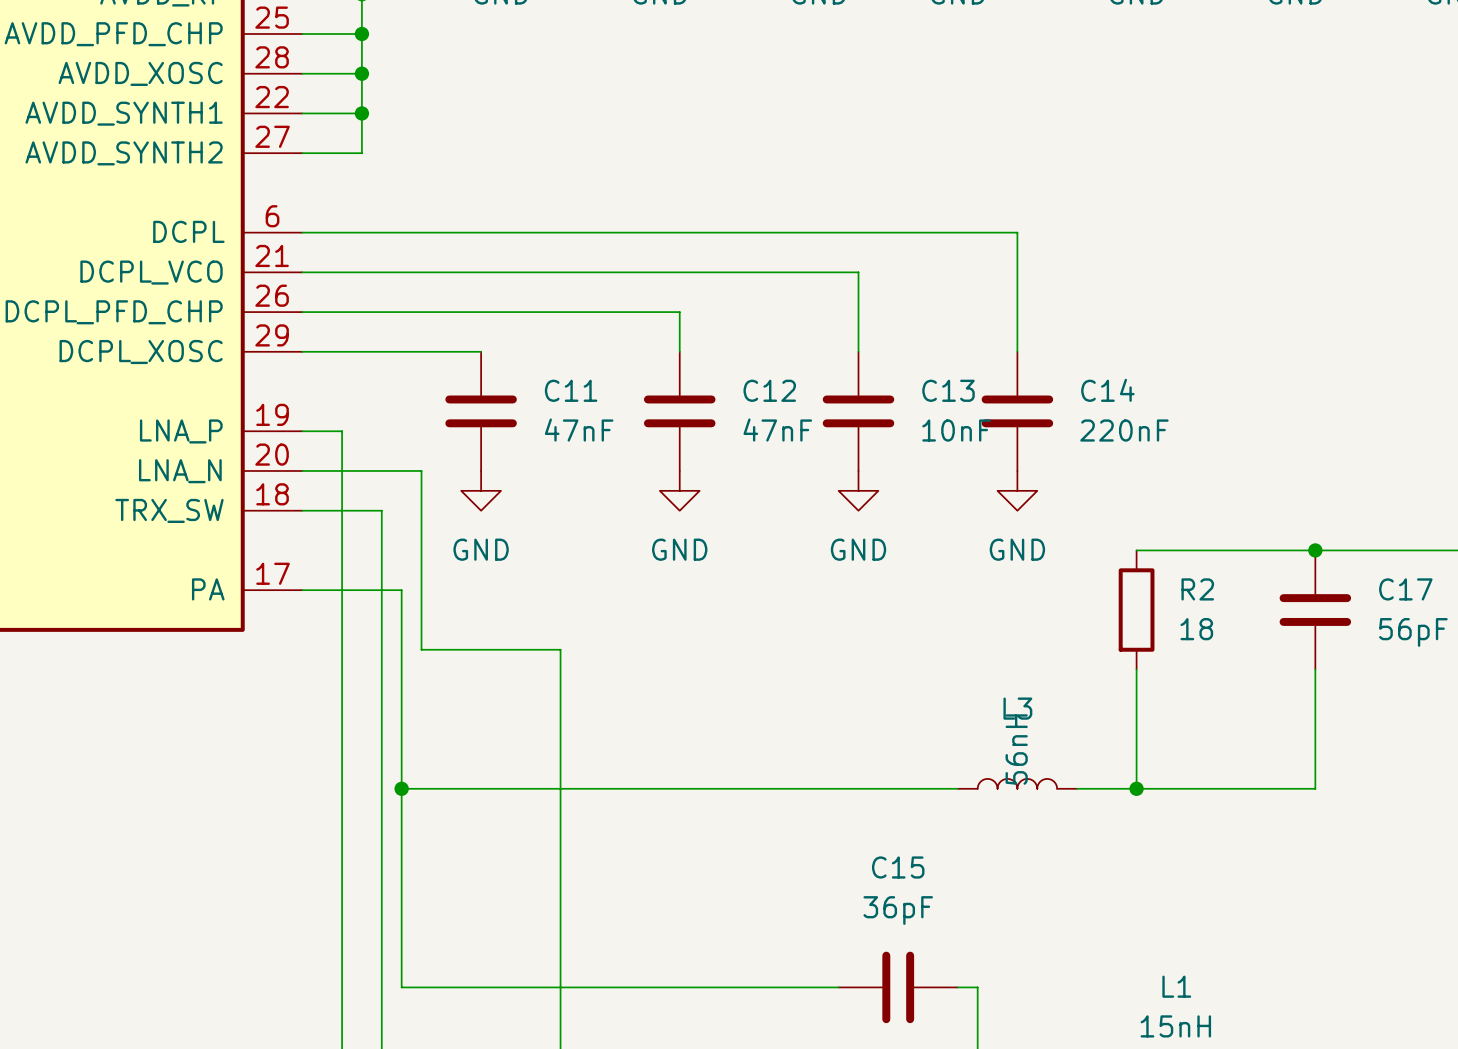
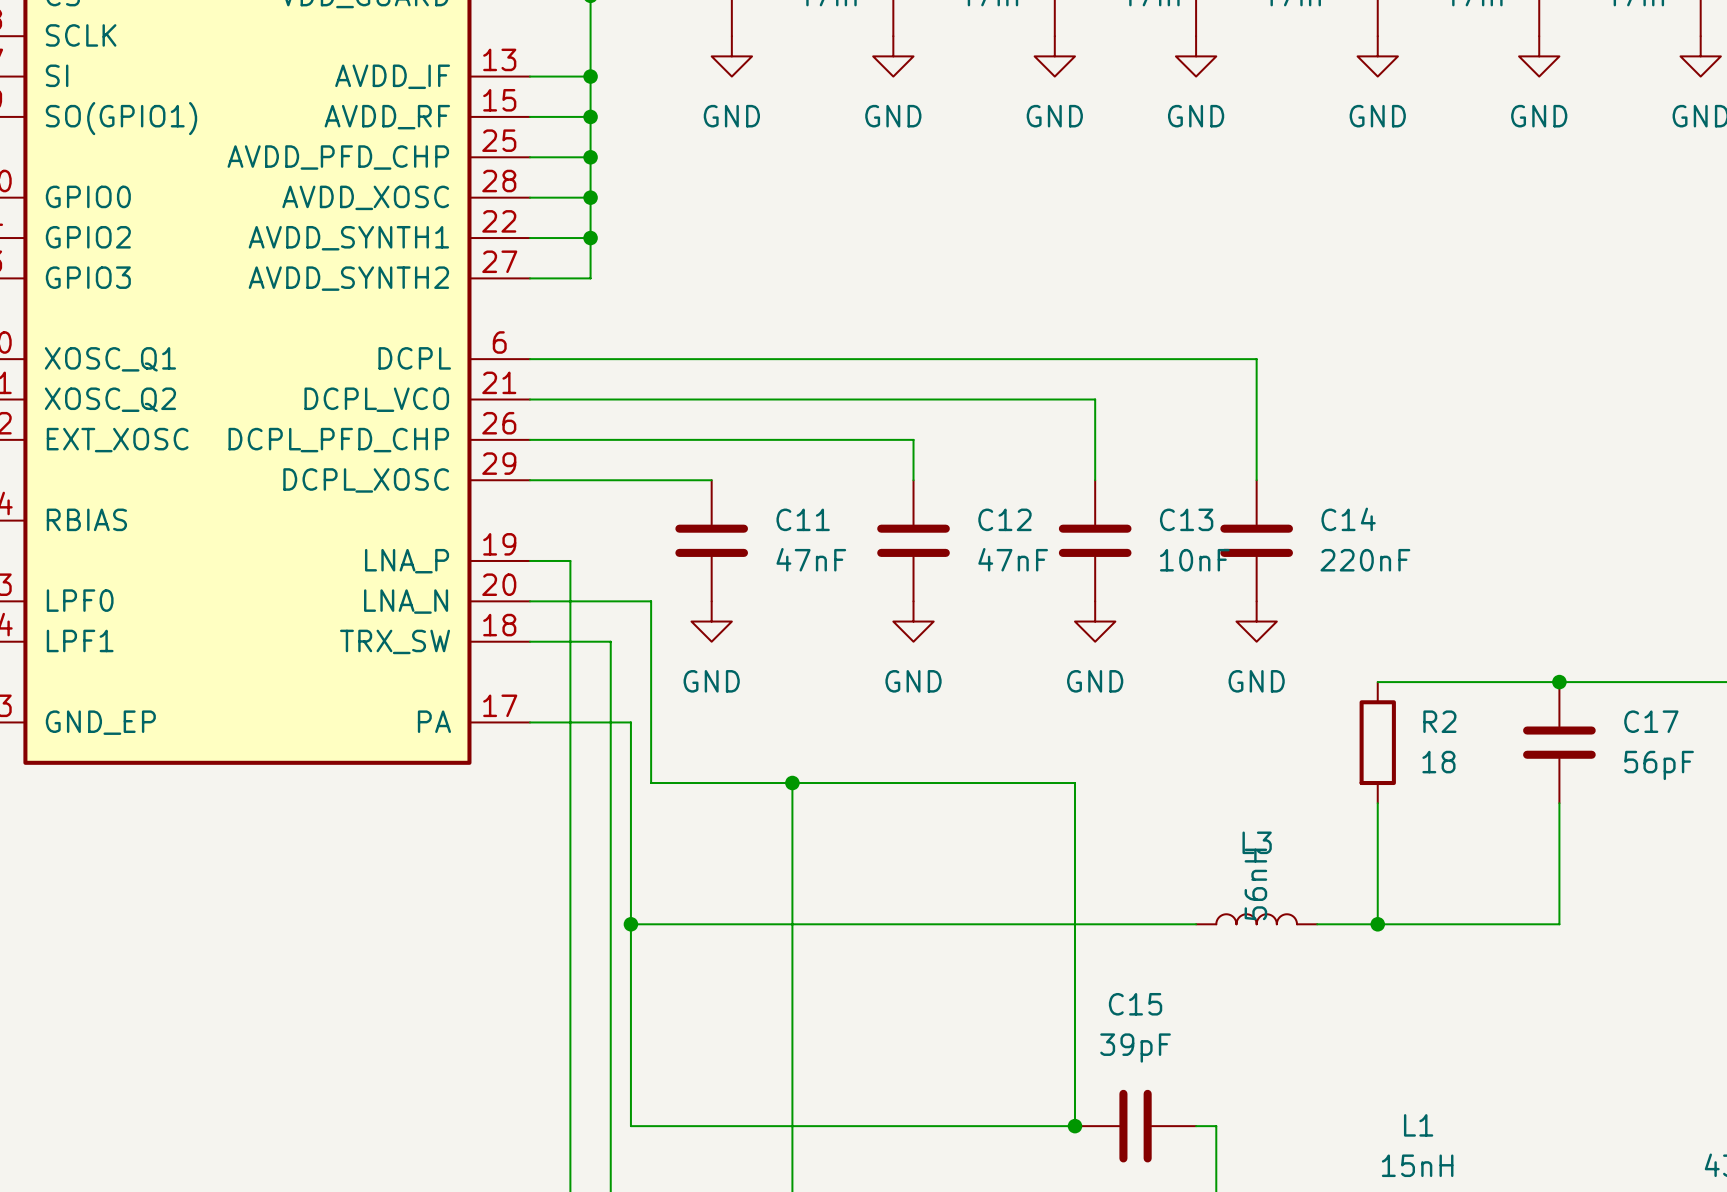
wire: none -> (792, 783) (1074, 783) (1074, 1126)
junction: none -> (792, 783)
C15 value: 36pF (898, 910) -> 39pF (1135, 1048)
junction: none -> (1074, 1126)

